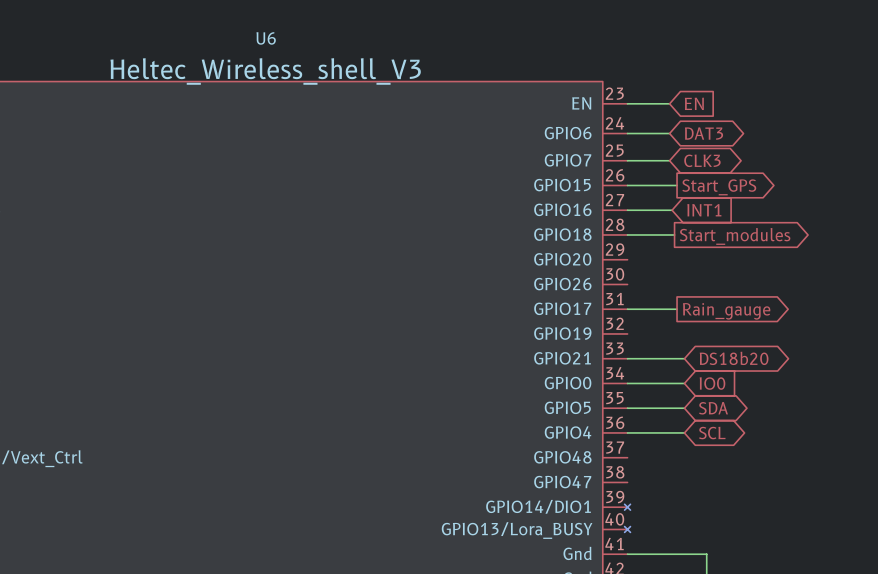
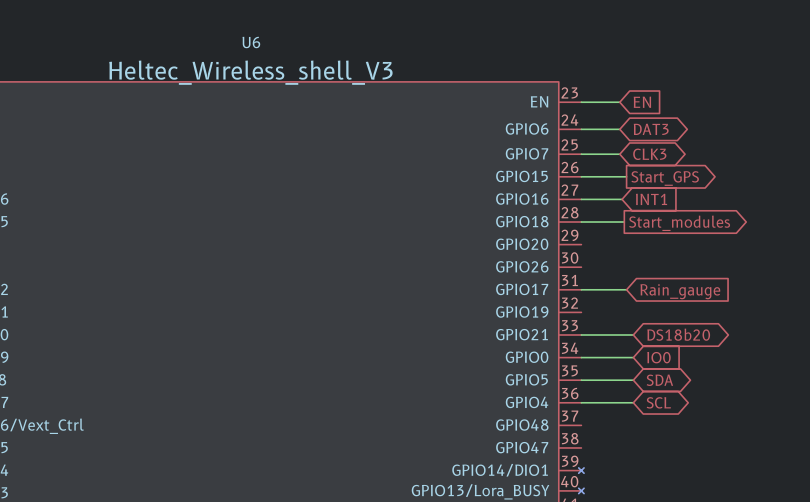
global label shape: output (726, 311) -> input (680, 291)

